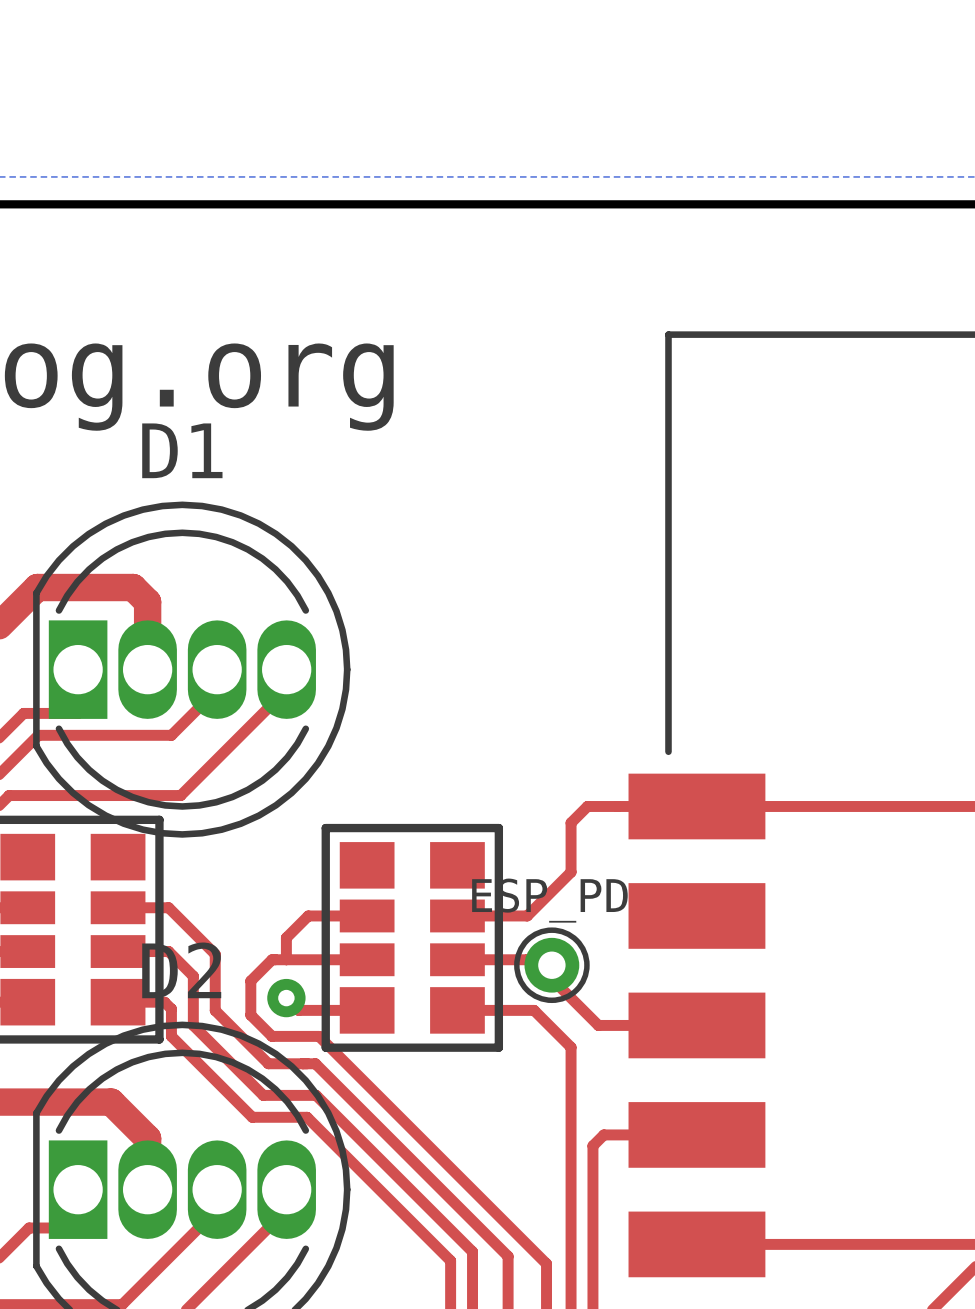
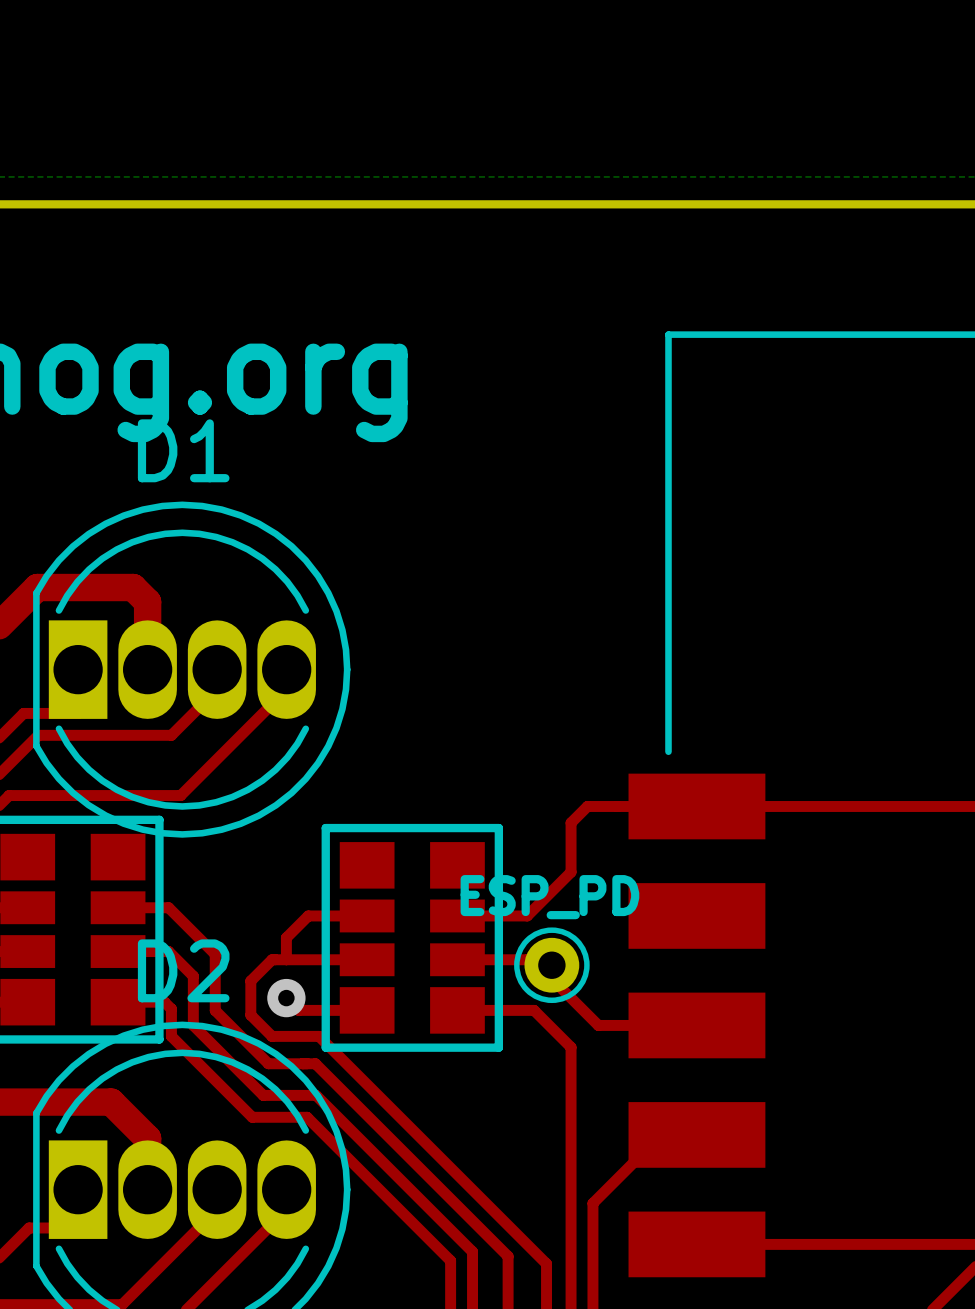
top track: (661, 1134) (603, 1134) (592, 1145) (592, 1203) -> (661, 1134) (592, 1203)

